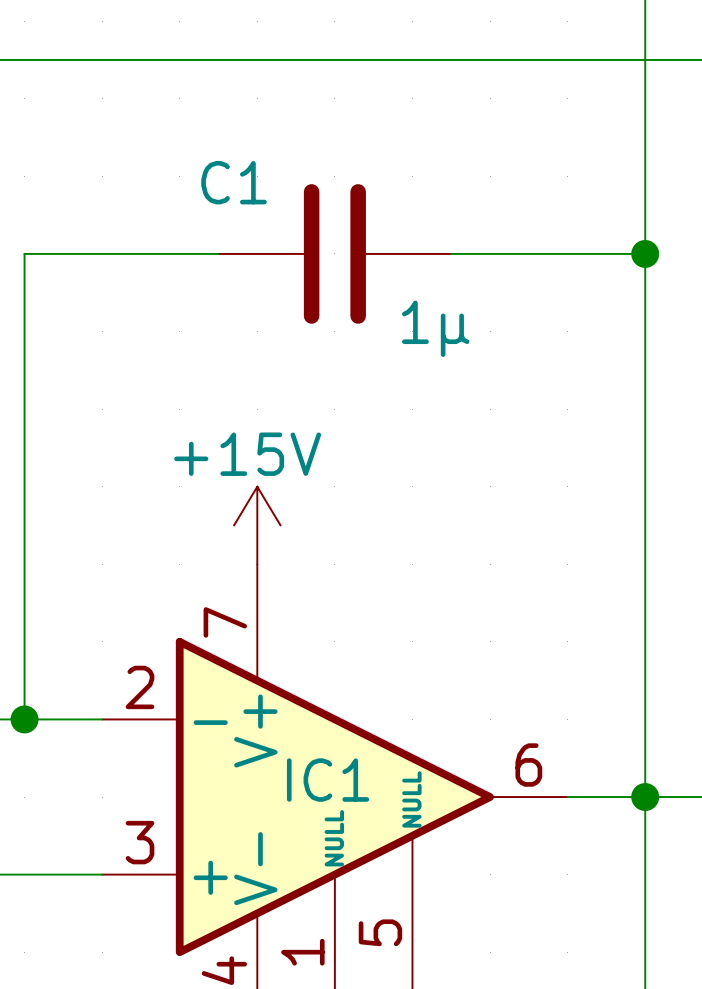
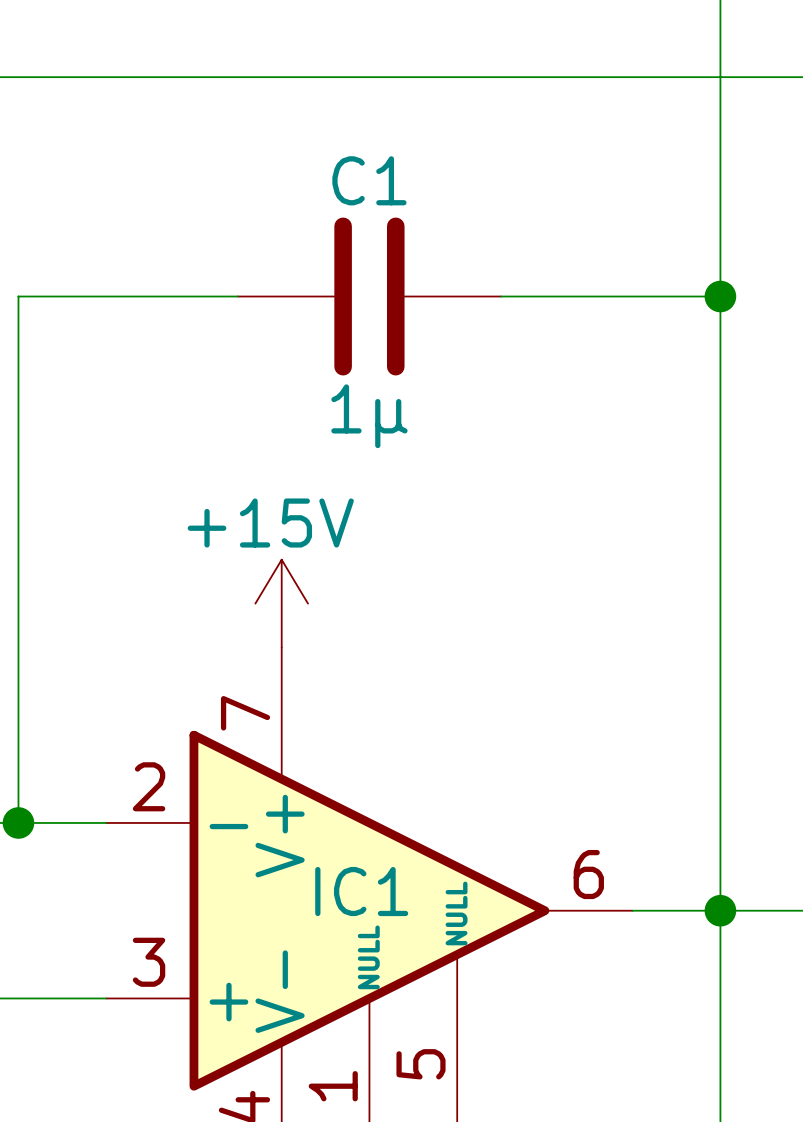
C1 name position: C1 (234, 182) -> C1 (369, 180)
C1 value position: 1µ (435, 328) -> 1µ (369, 416)

